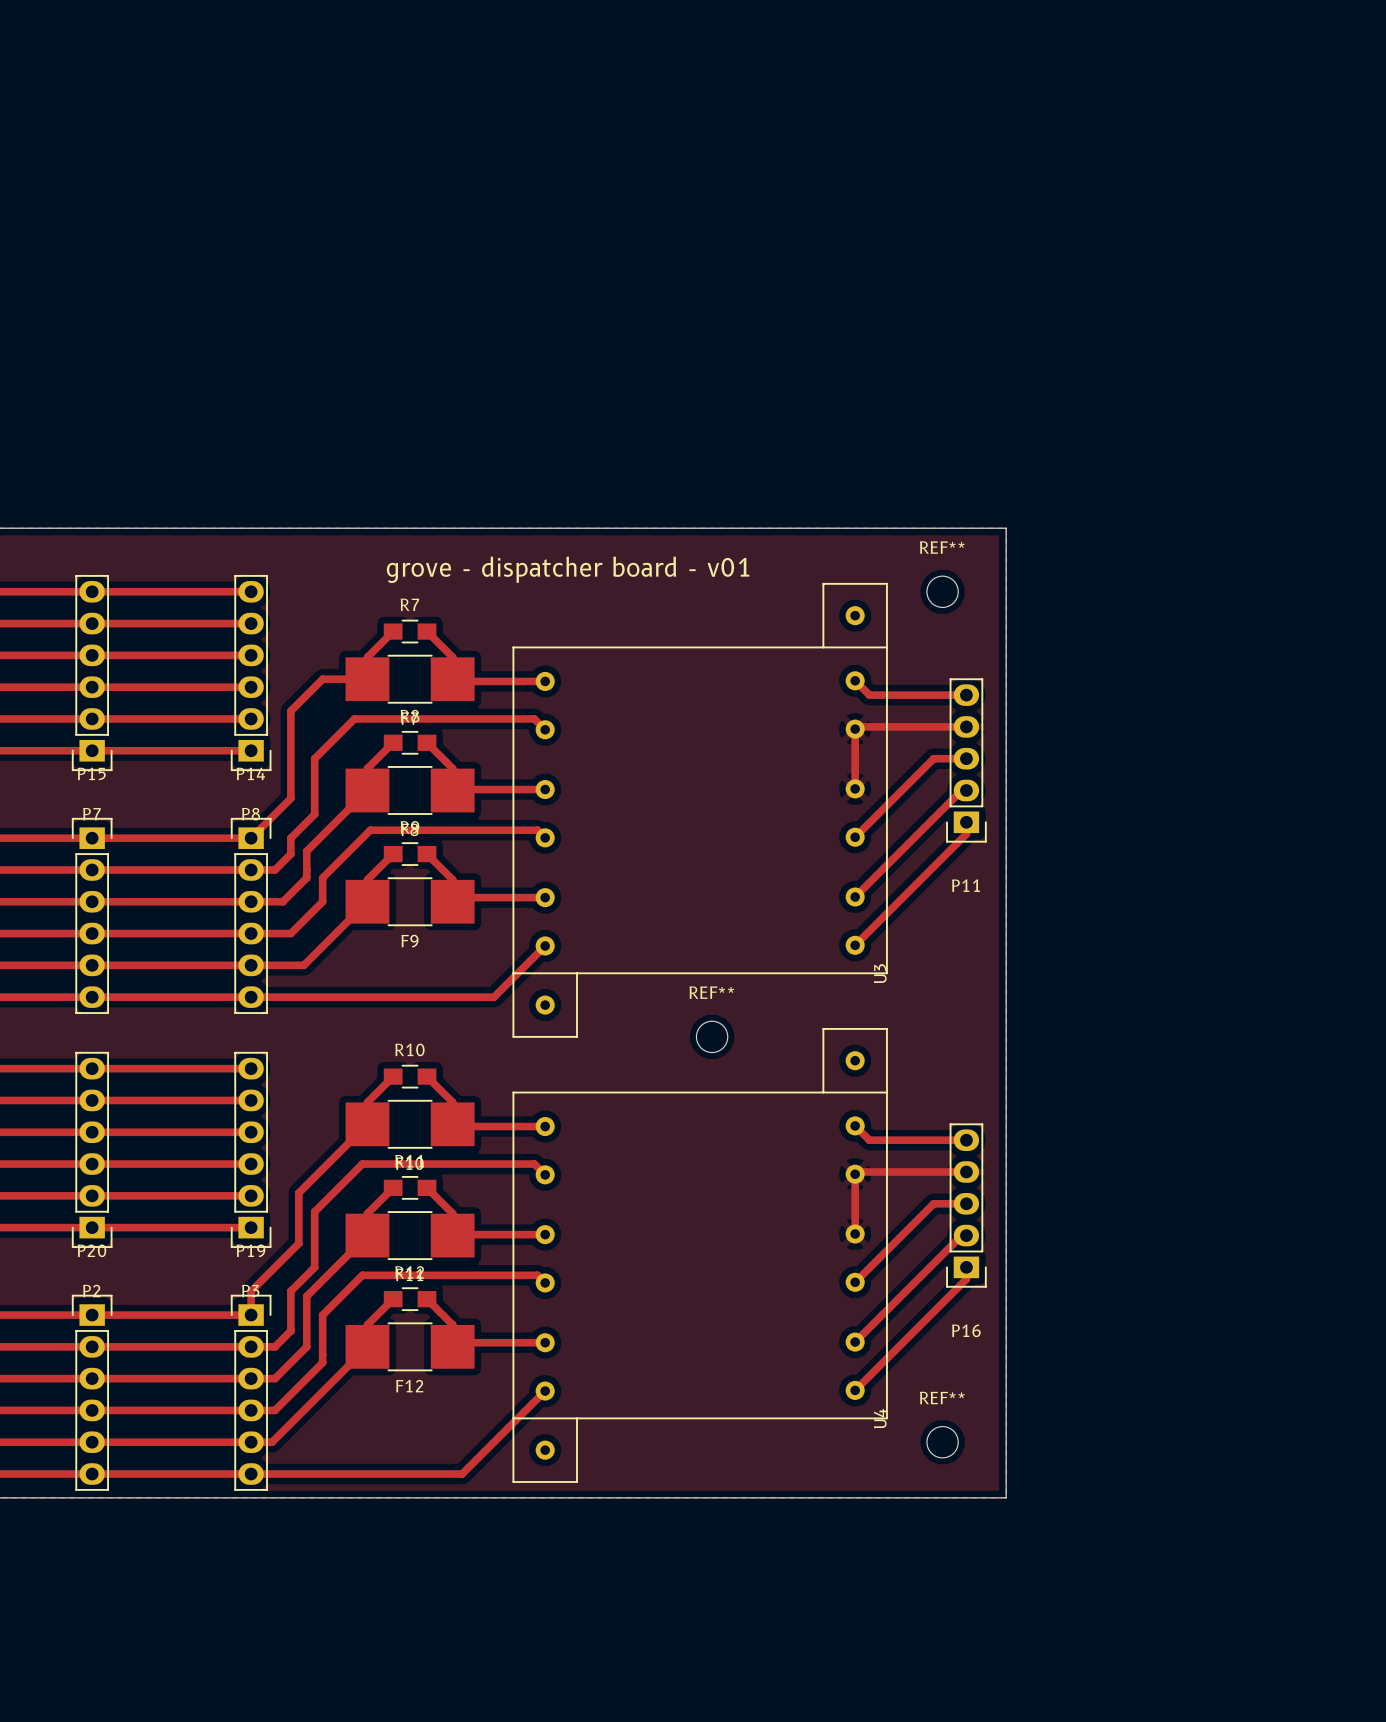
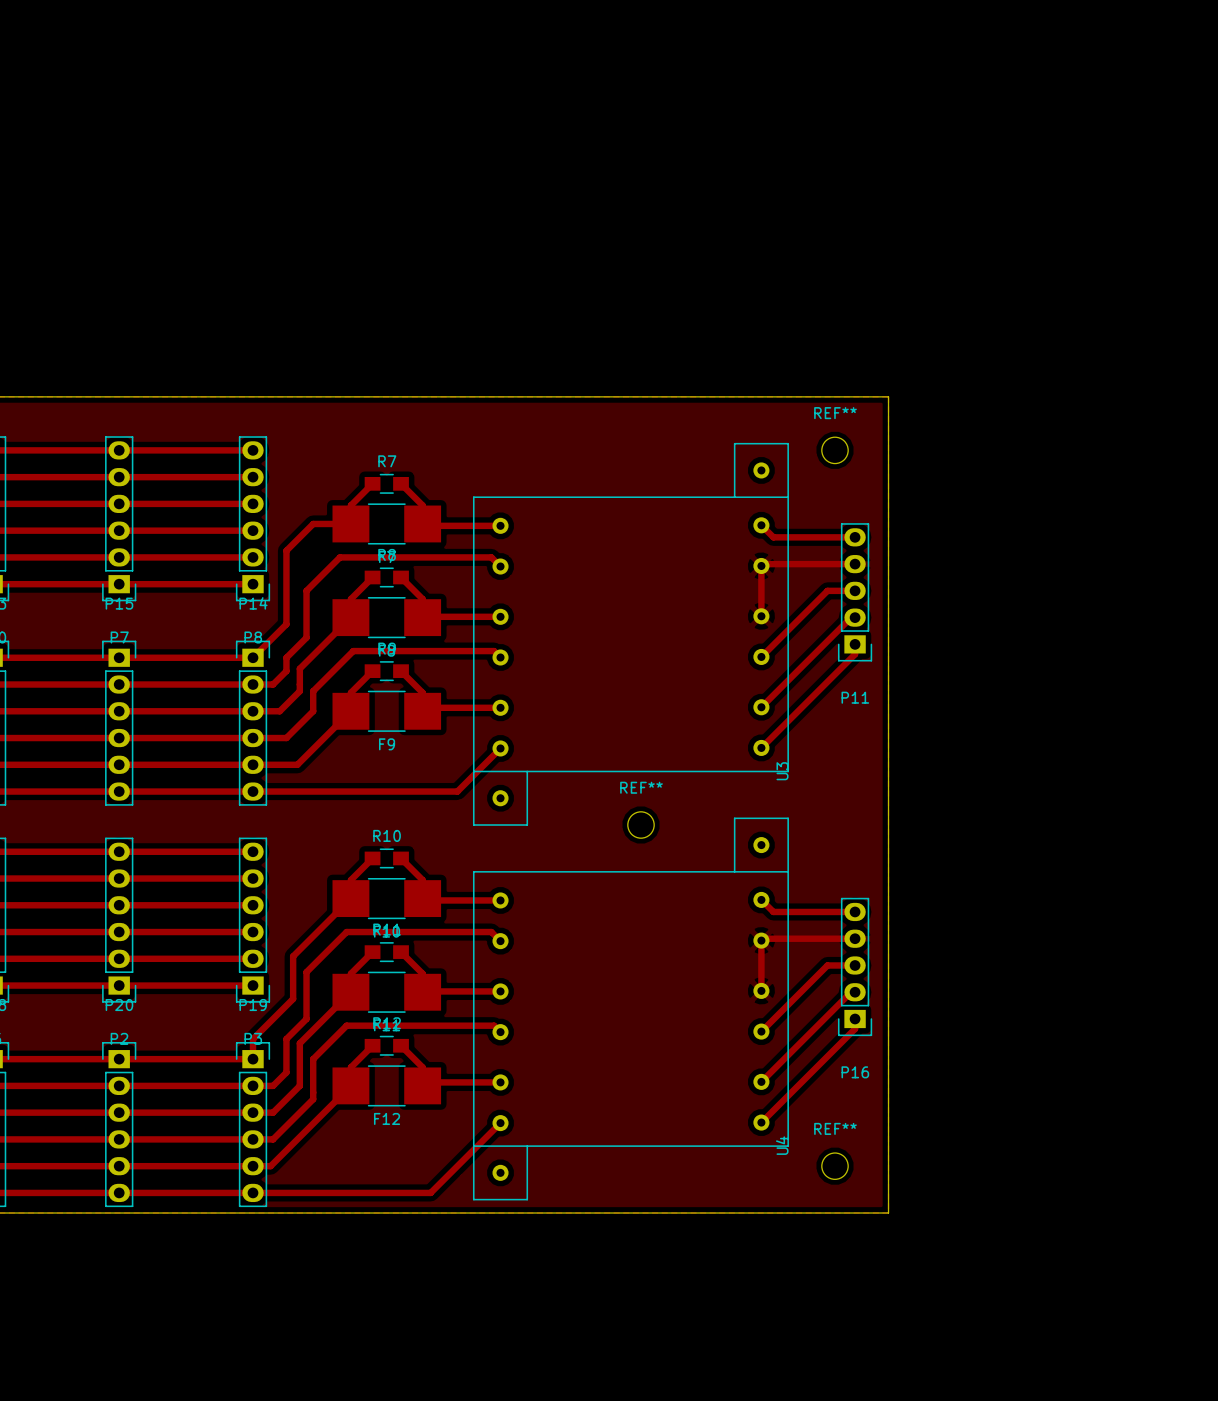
text: grove - dispatcher board - v01 (568, 569) -> none

